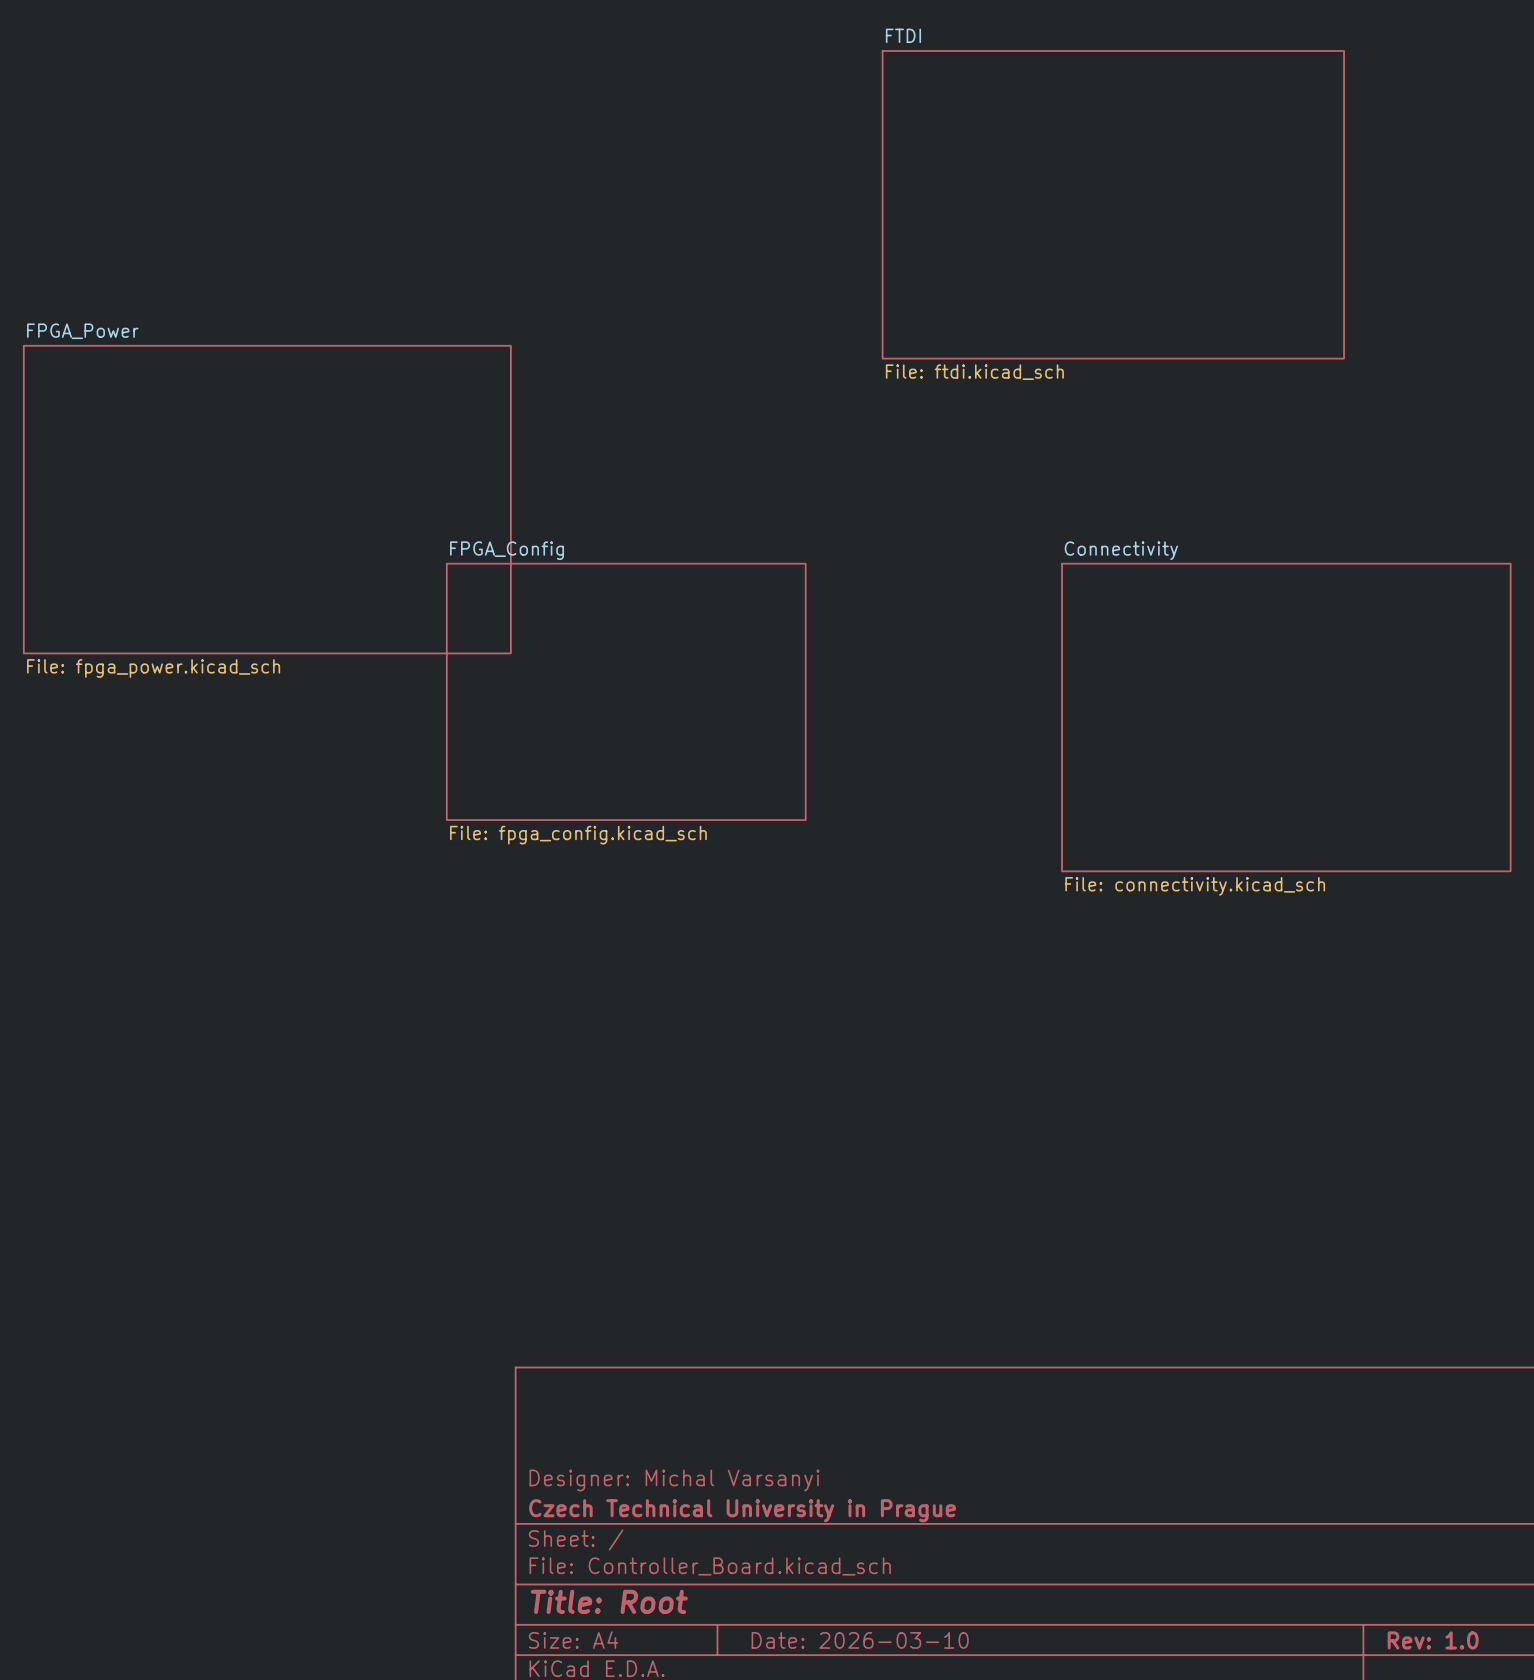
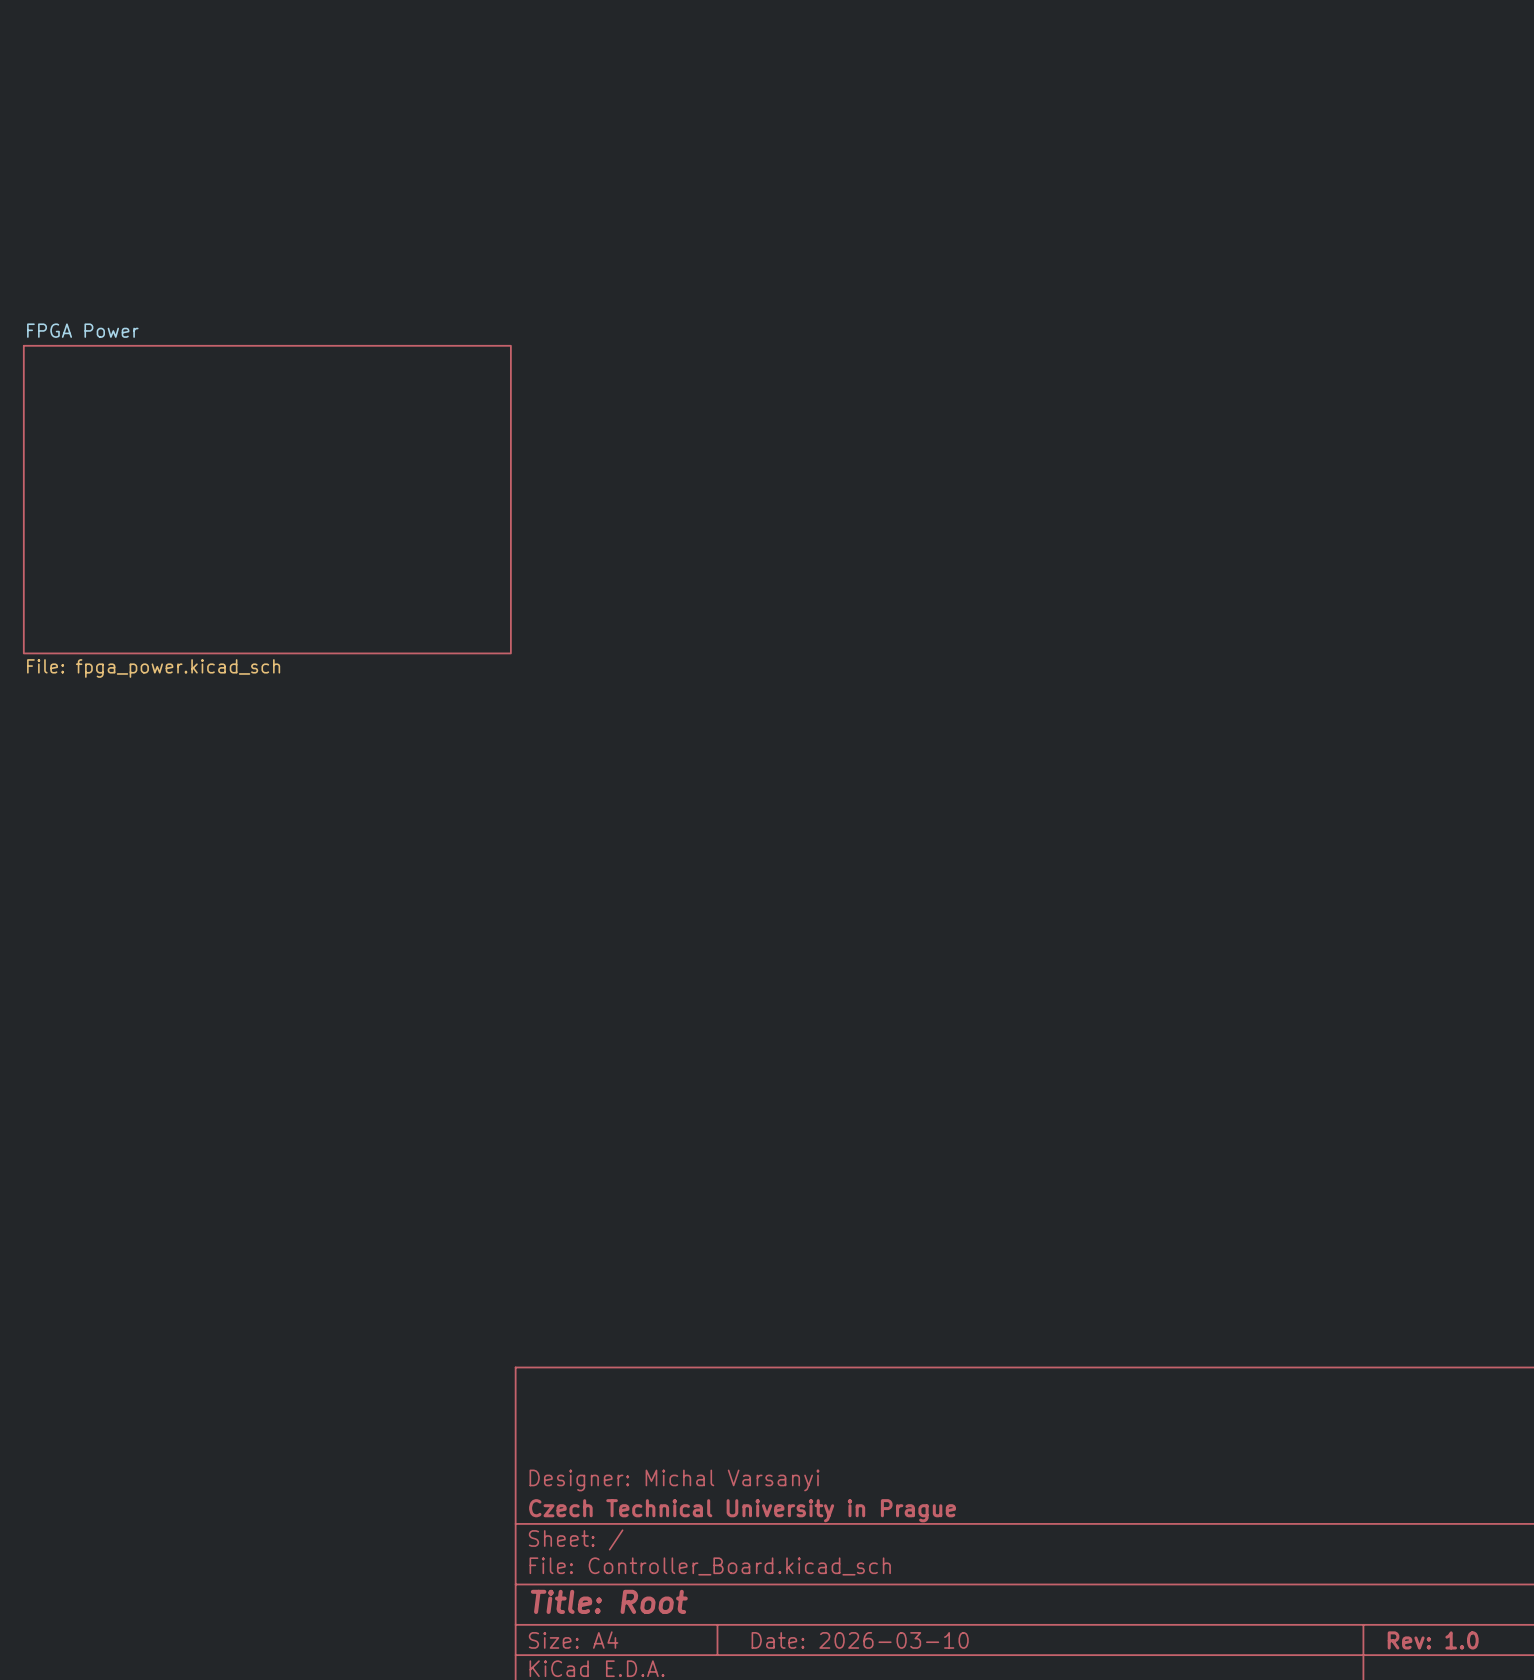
sheet FTDI: File: ftdi.kicad_sch (1113, 204) -> none
sheet FPGA_Power name: FPGA_Power (82, 331) -> FPGA Power (82, 330)
sheet FPGA_Config: File: fpga_config.kicad_sch (626, 691) -> none
sheet Connectivity: File: connectivity.kicad_sch (1286, 717) -> none

